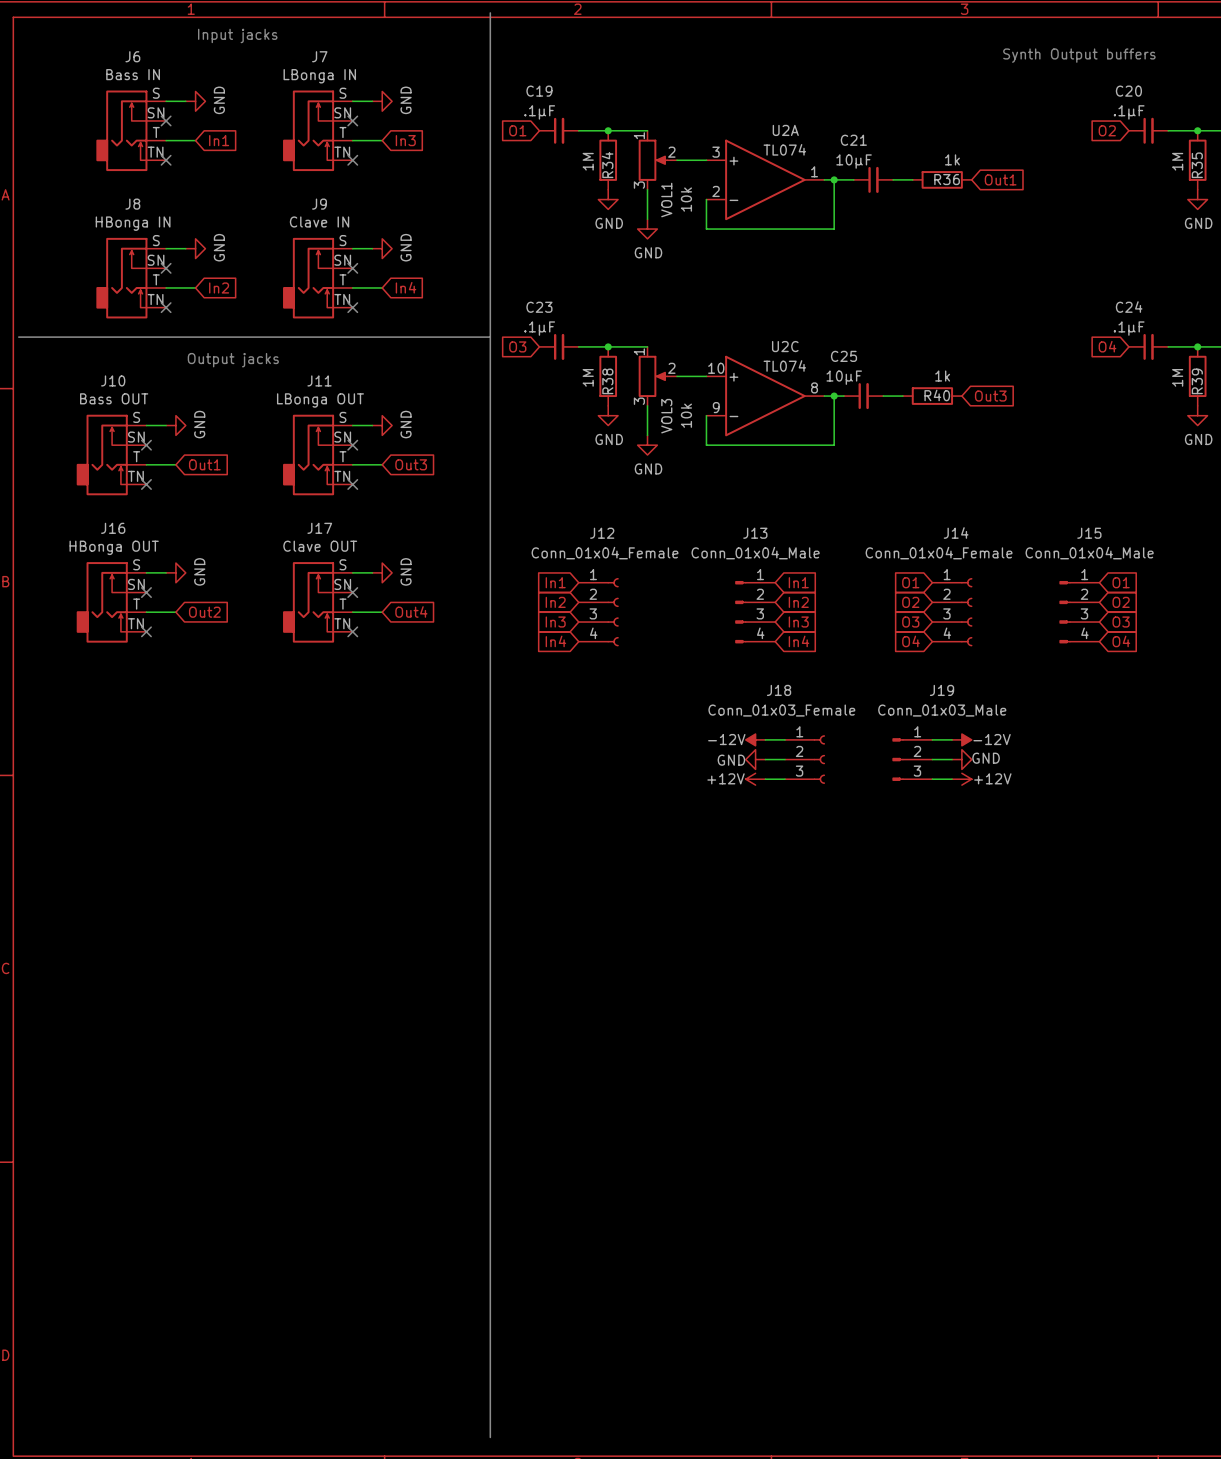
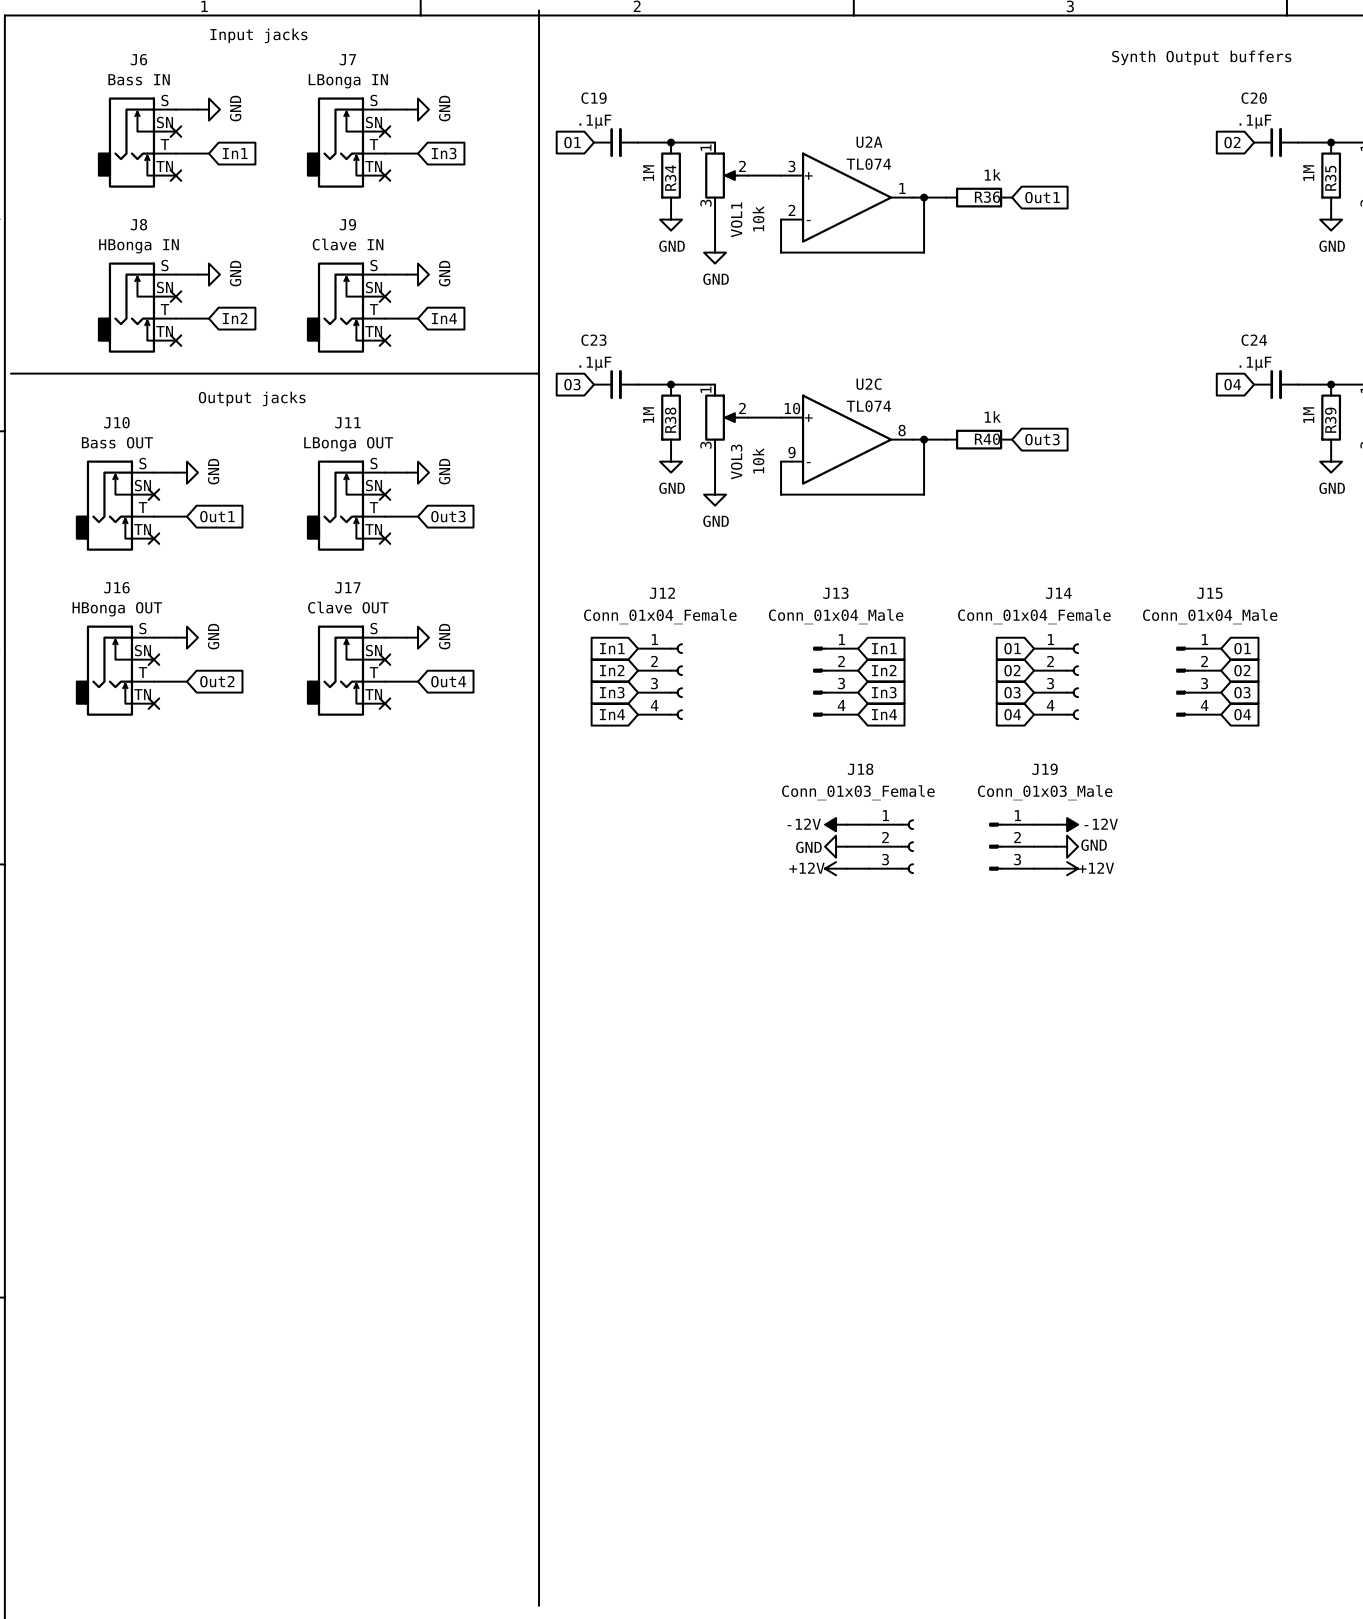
C21: 10µF (873, 179) -> none
R36 position: (942, 179) -> (979, 197)
global label position: Out1 (1000, 179) -> Out1 (1042, 197)
C25: 10µF (863, 396) -> none
wire: (883, 396) (902, 396) -> none
R40 position: (932, 396) -> (979, 439)
global label position: Out3 (990, 396) -> Out3 (1042, 439)

